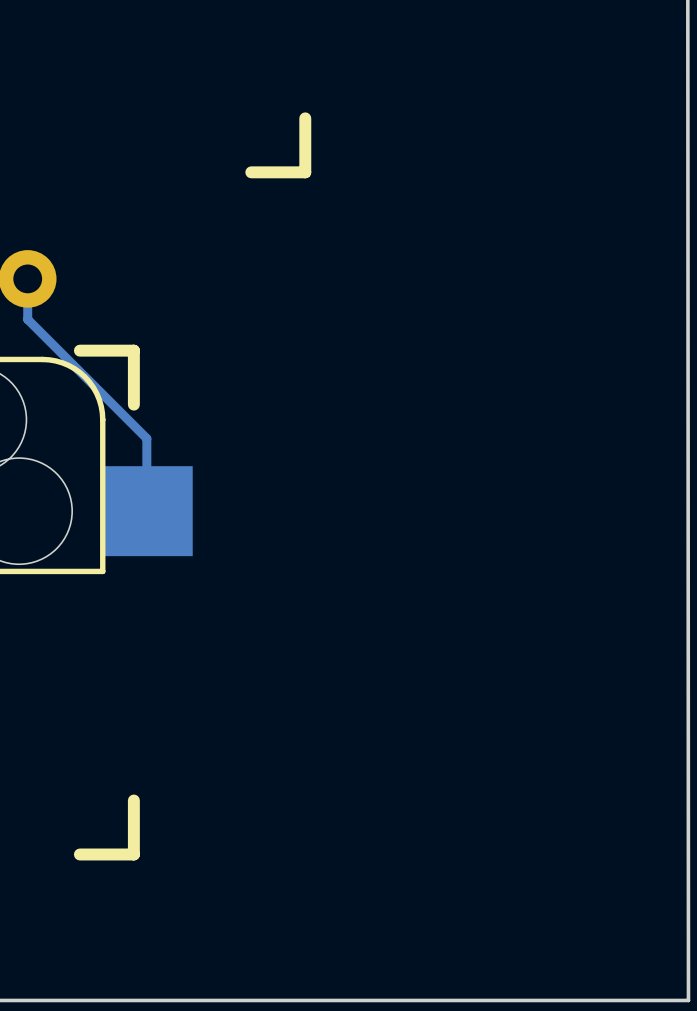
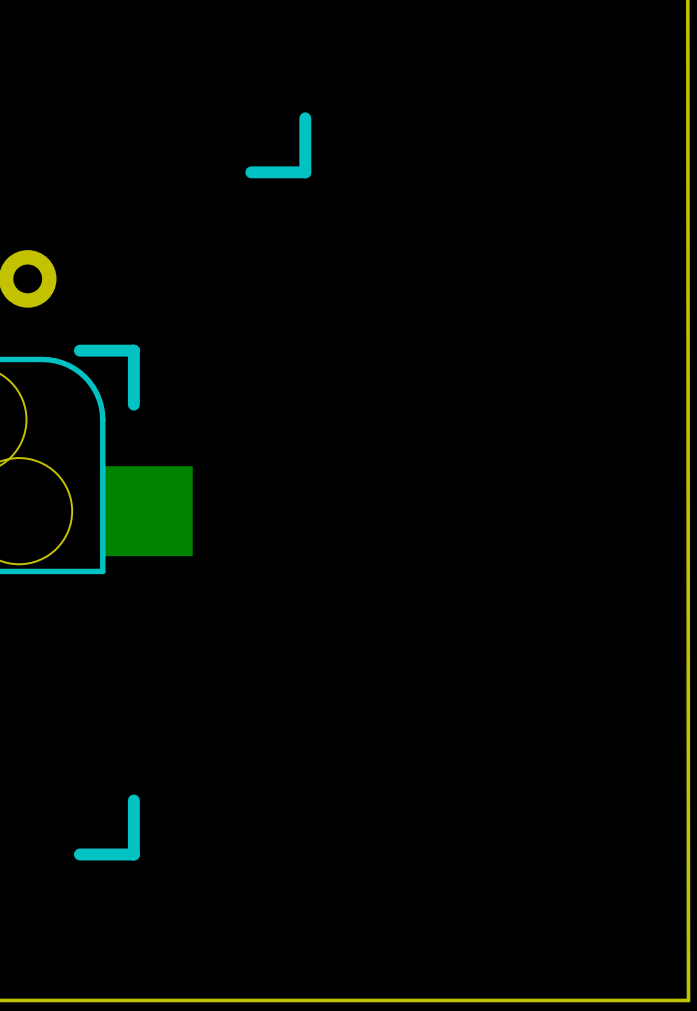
track: (27, 278) (27, 319) (146, 438) (146, 511) -> none

